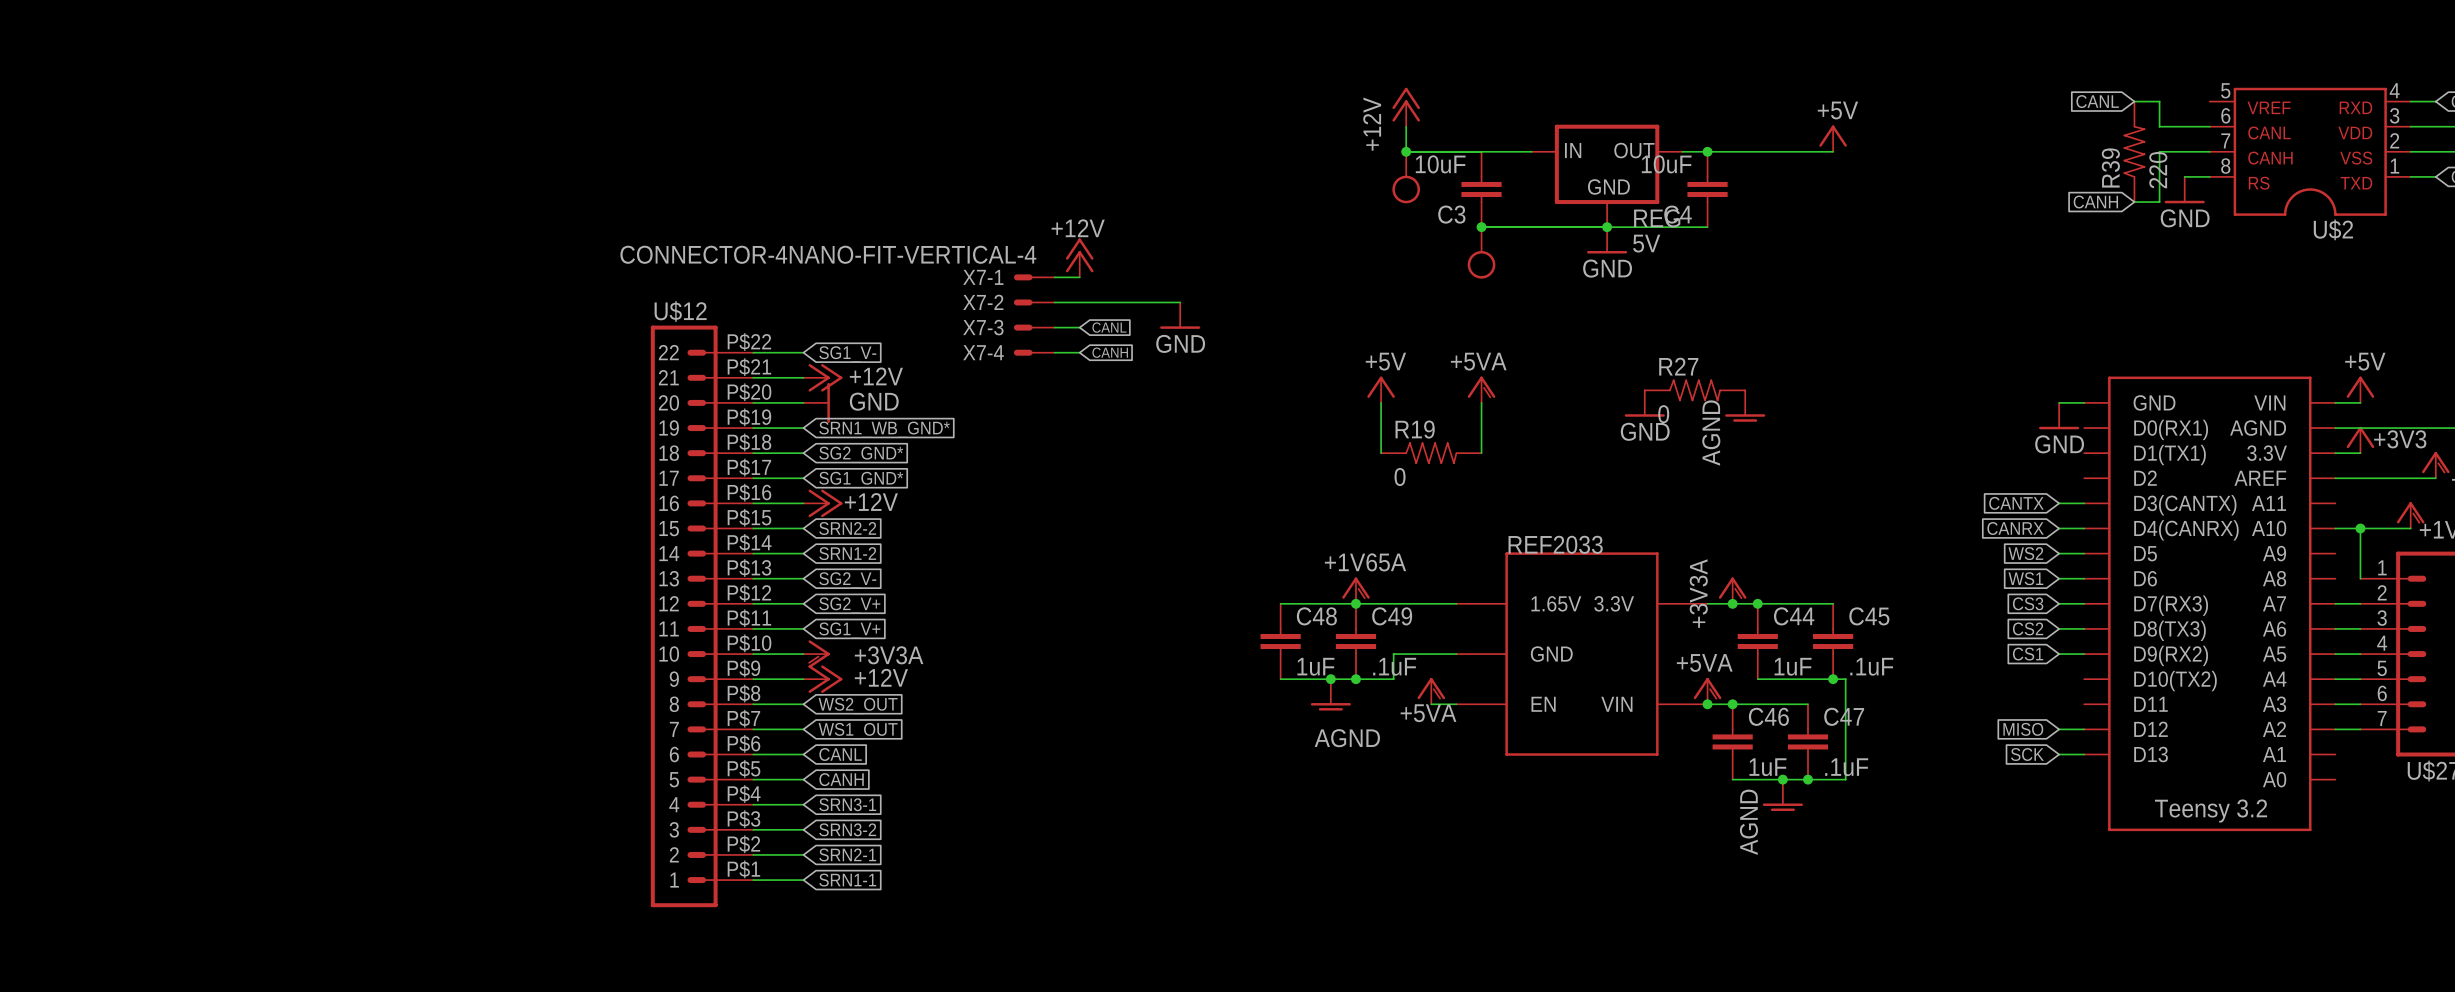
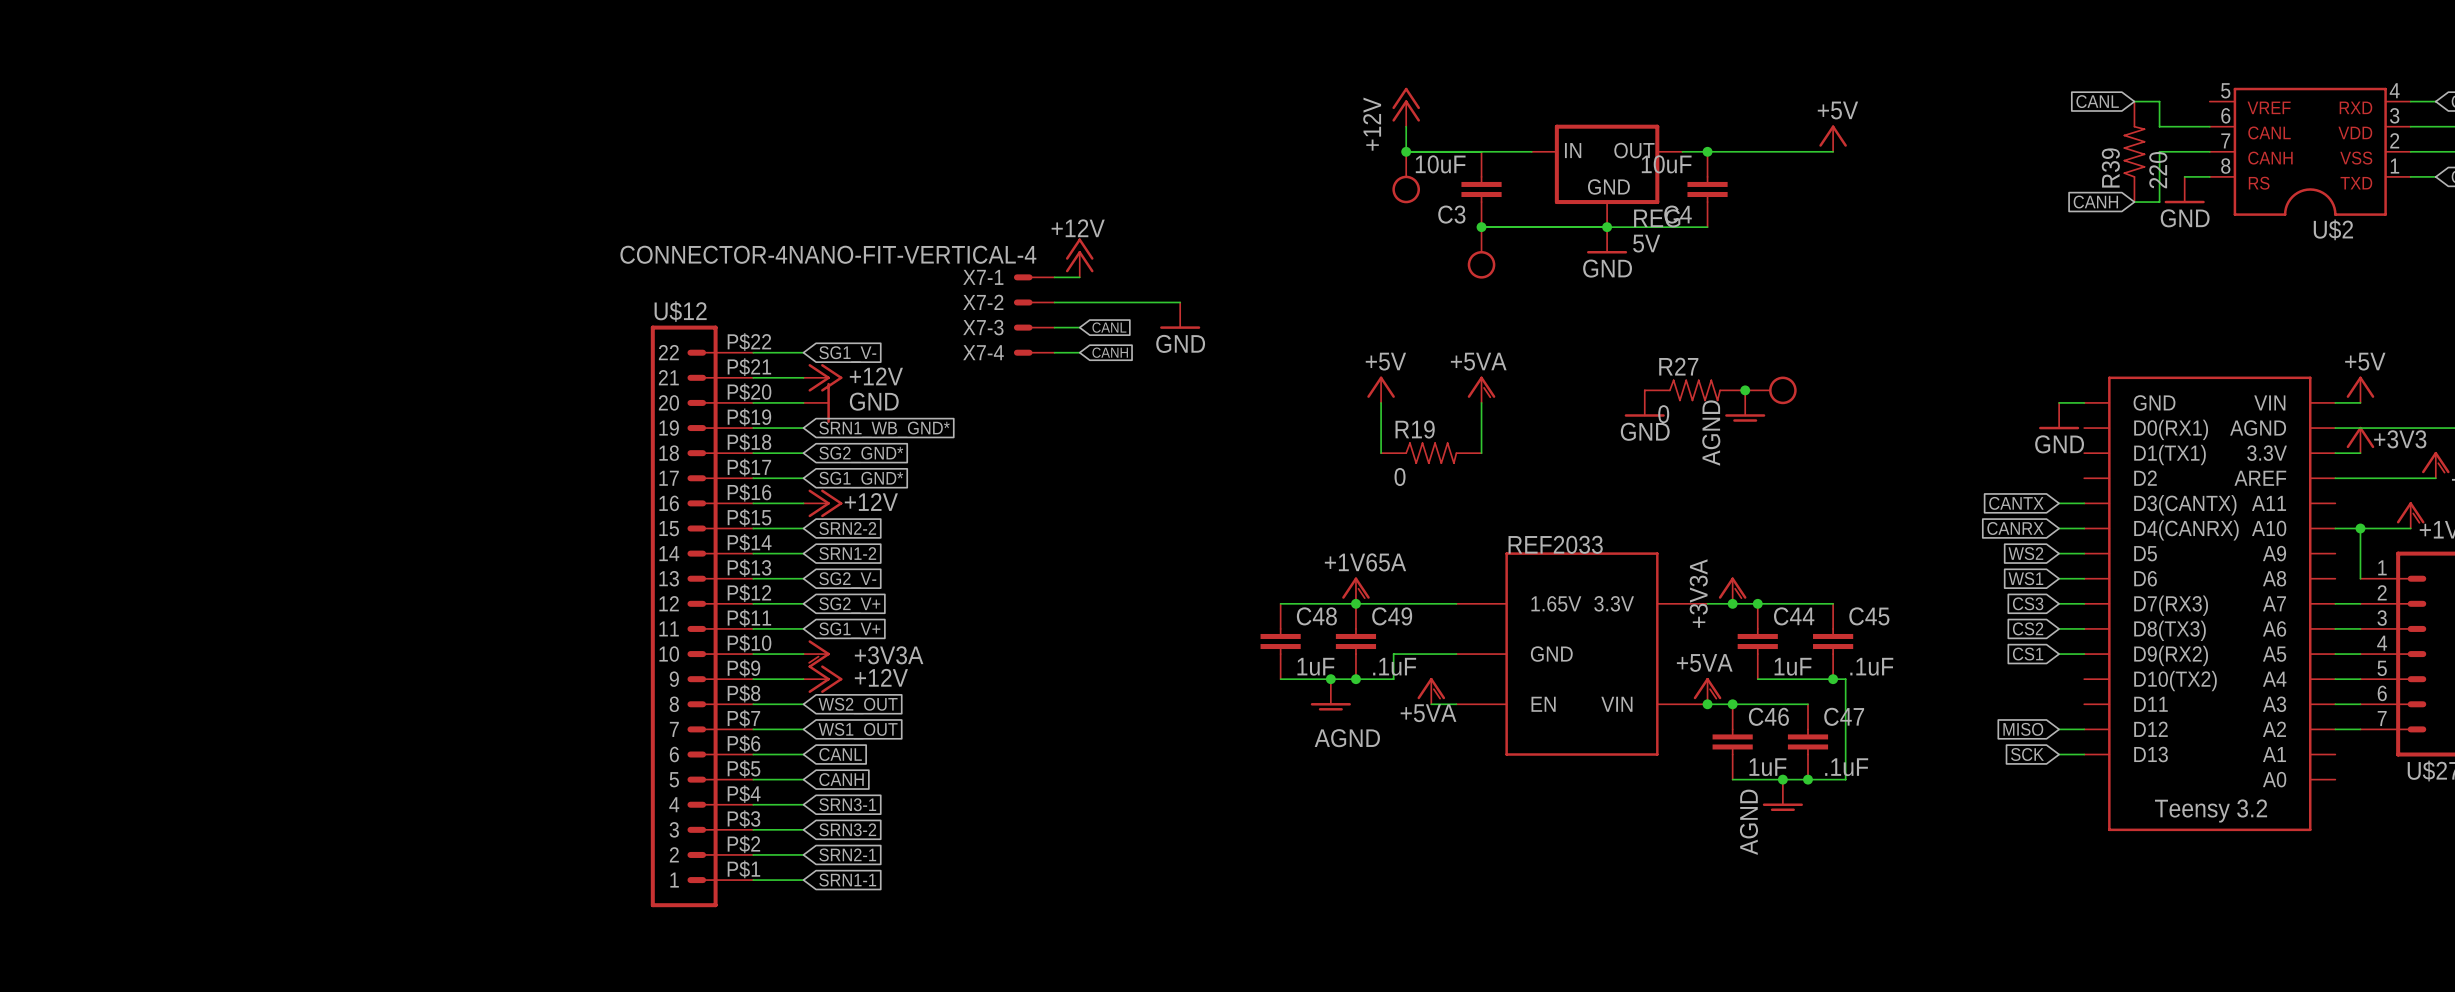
junction: none -> (1745, 390)
part: none -> (1770, 390)

